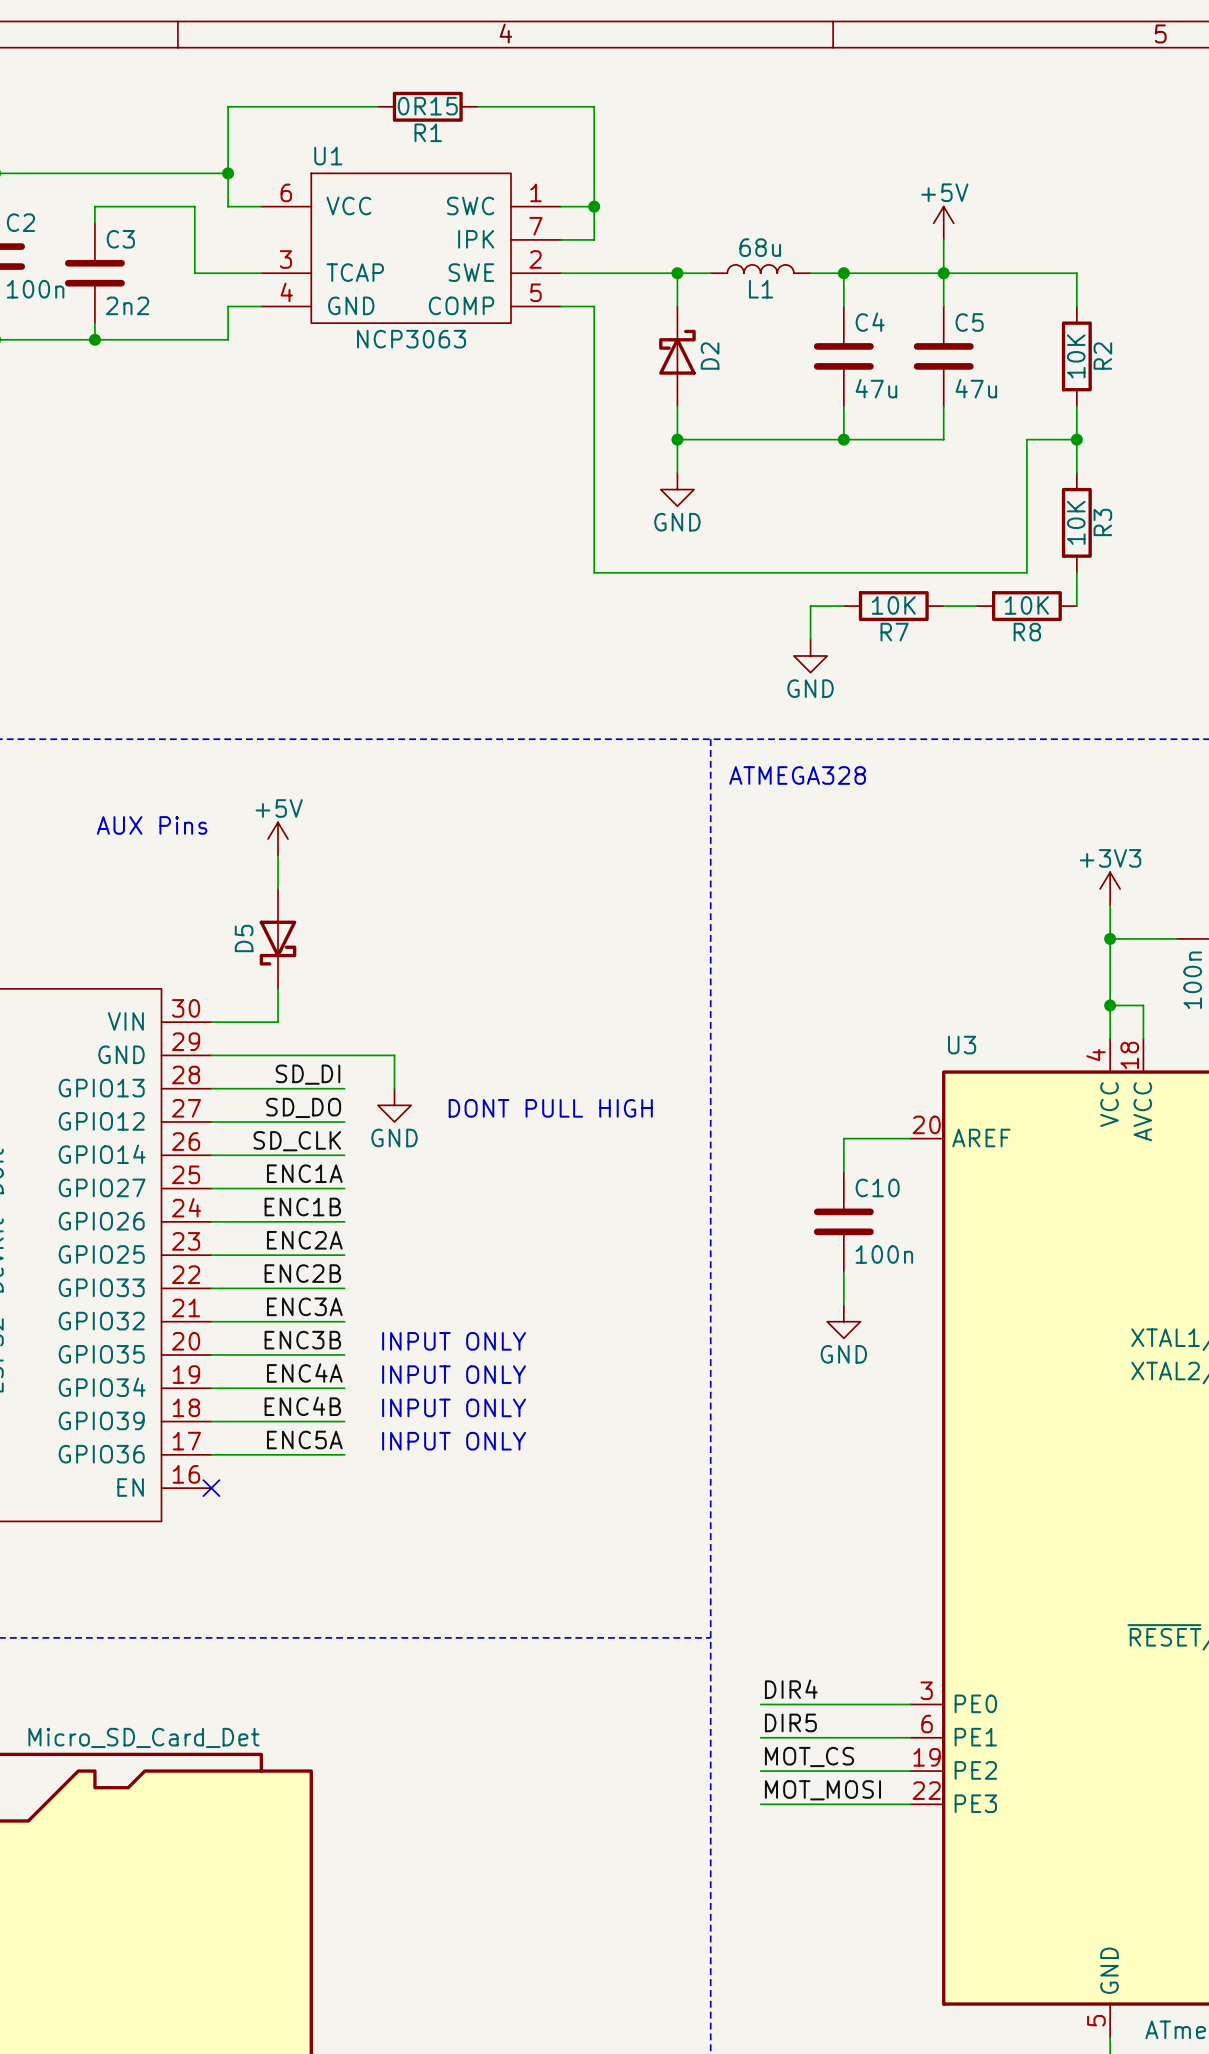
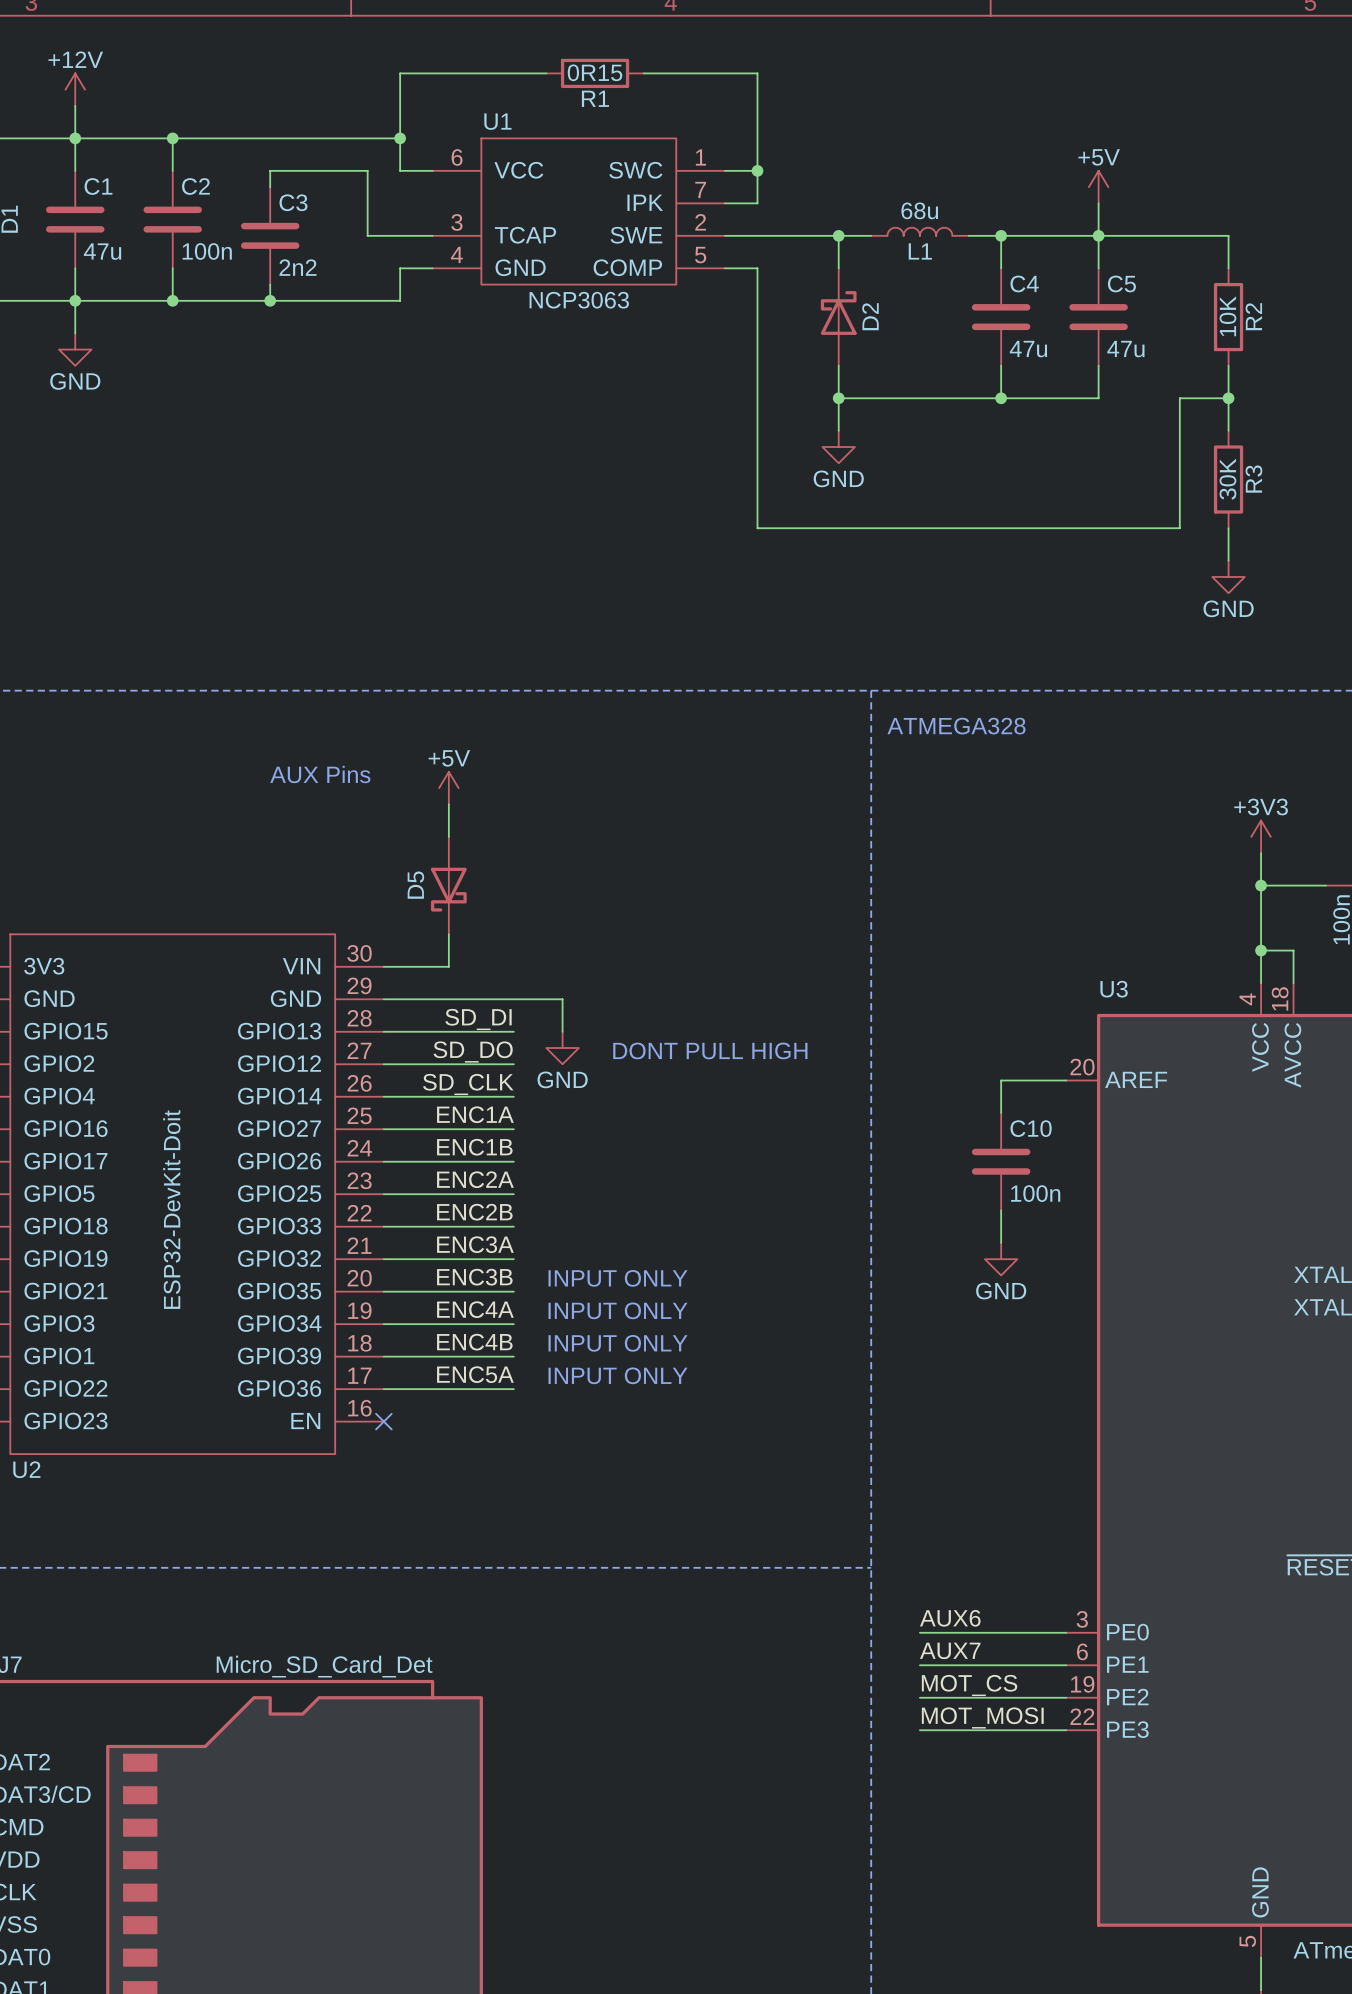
R3 value: 10K (1076, 522) -> 30K (1227, 479)
wire: (843, 606) (810, 606) (810, 639) -> none
R7: 10K (893, 606) -> none
wire: (943, 606) (976, 606) -> none
R8: 10K (1026, 606) -> none
power symbol position: GND (810, 655) -> GND (1228, 576)
label: DIR4 (791, 1689) -> AUX6 (950, 1618)
label: DIR5 (790, 1722) -> AUX7 (950, 1650)

